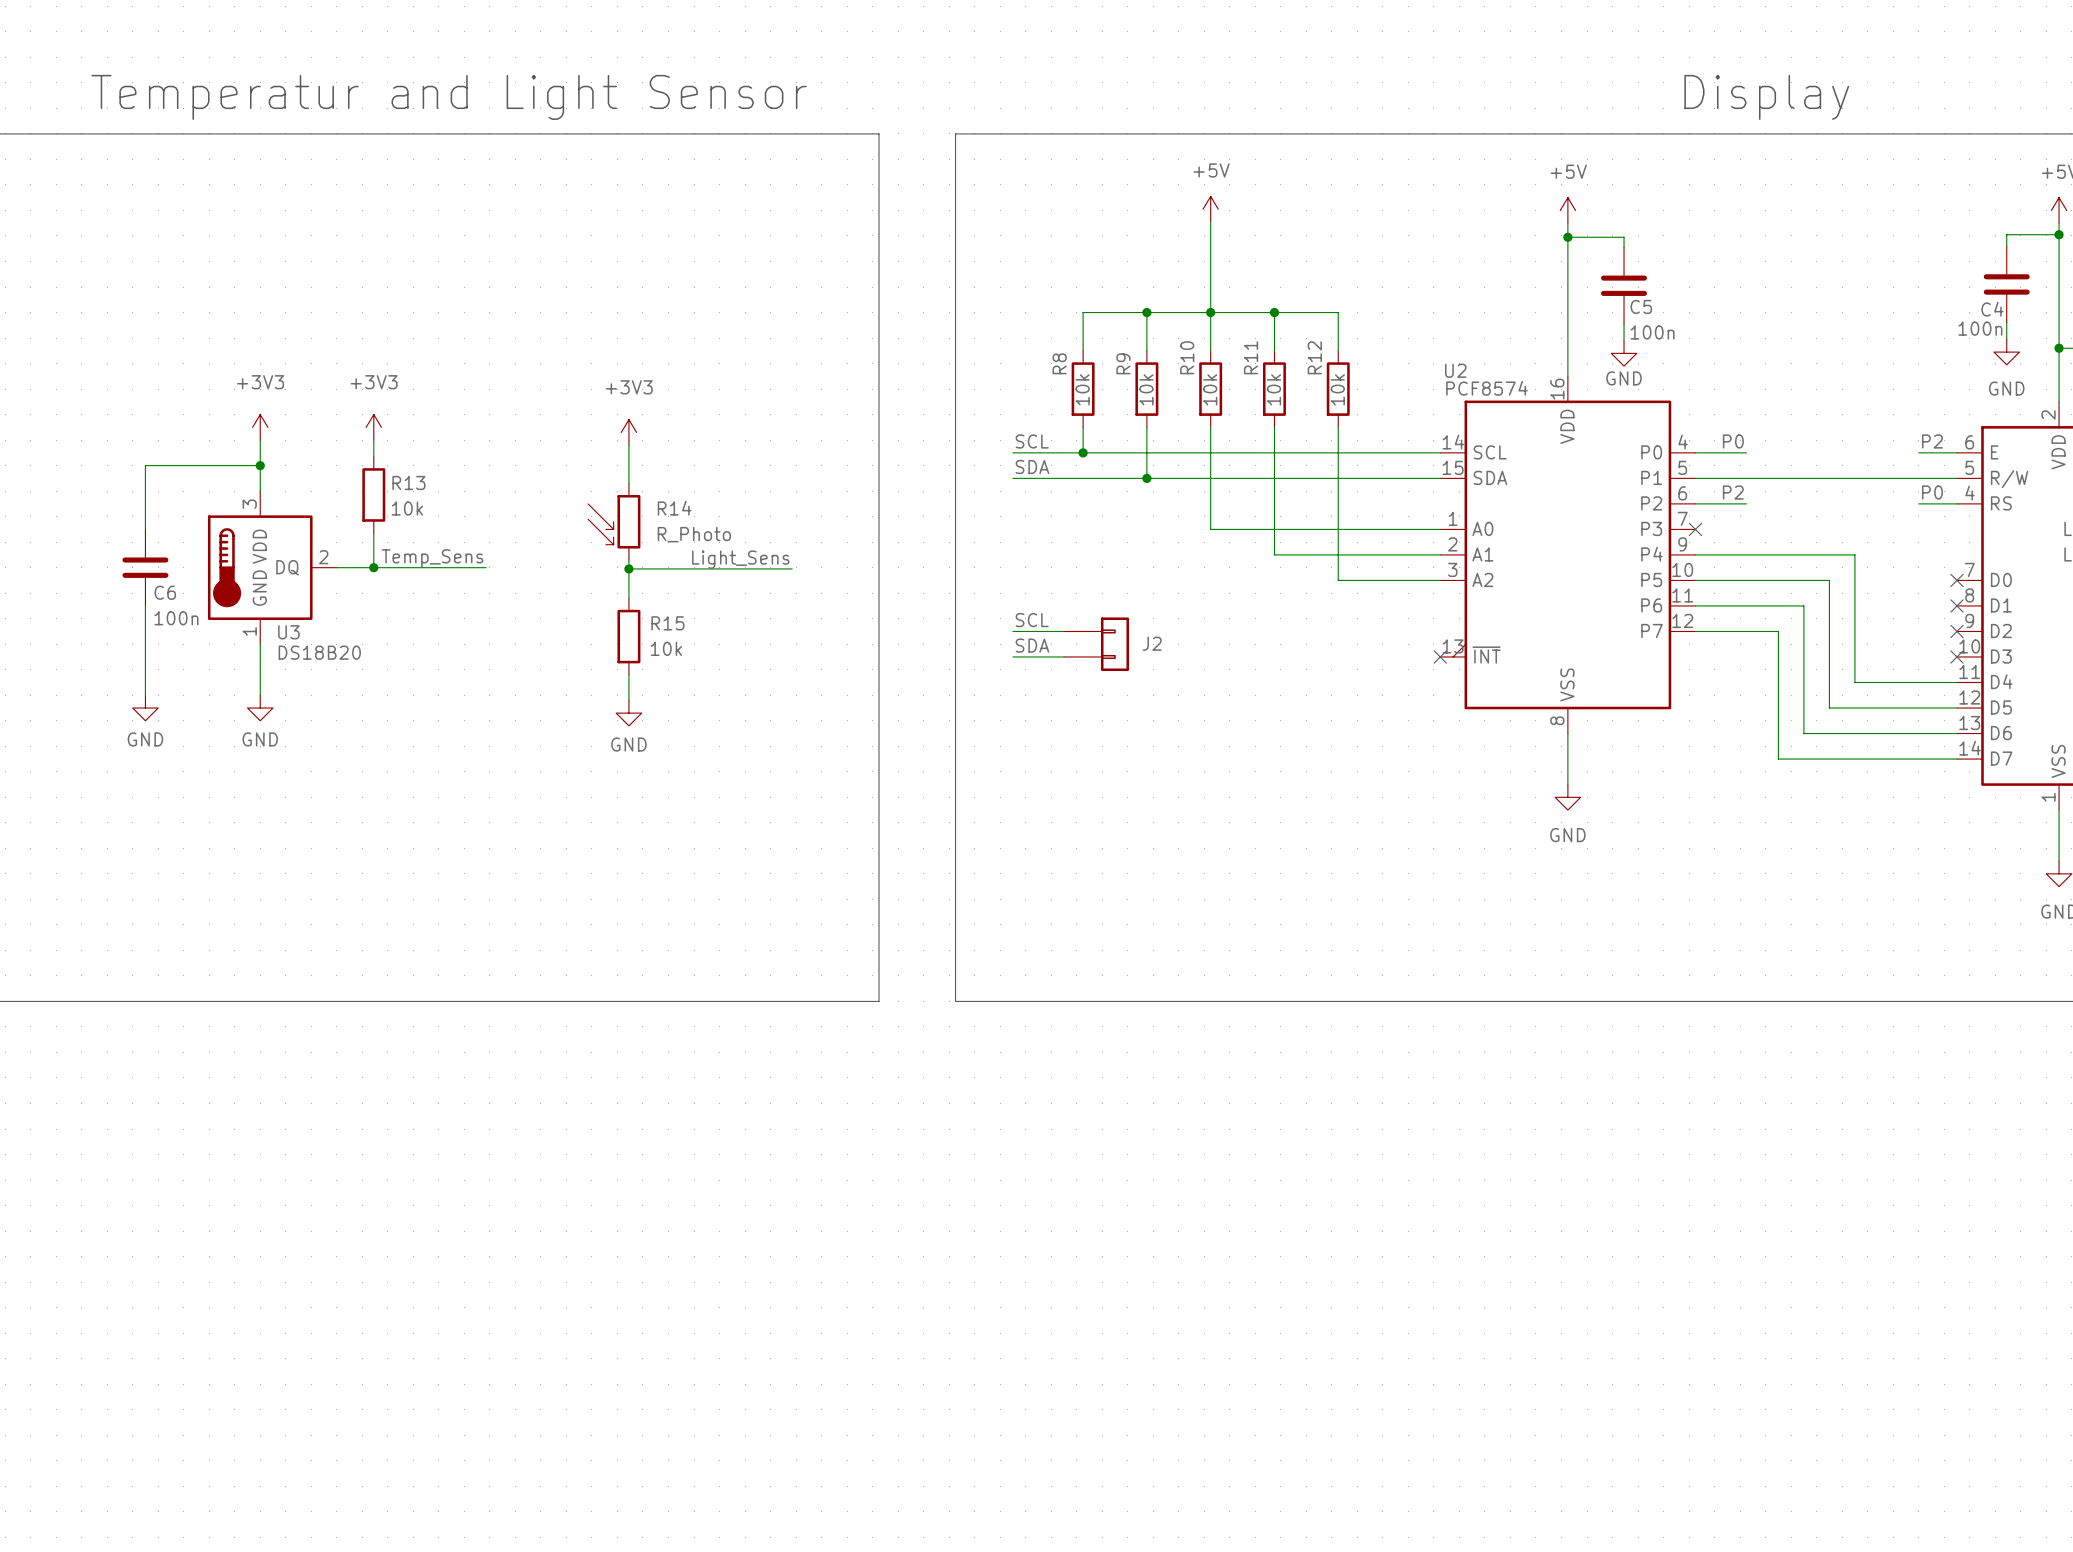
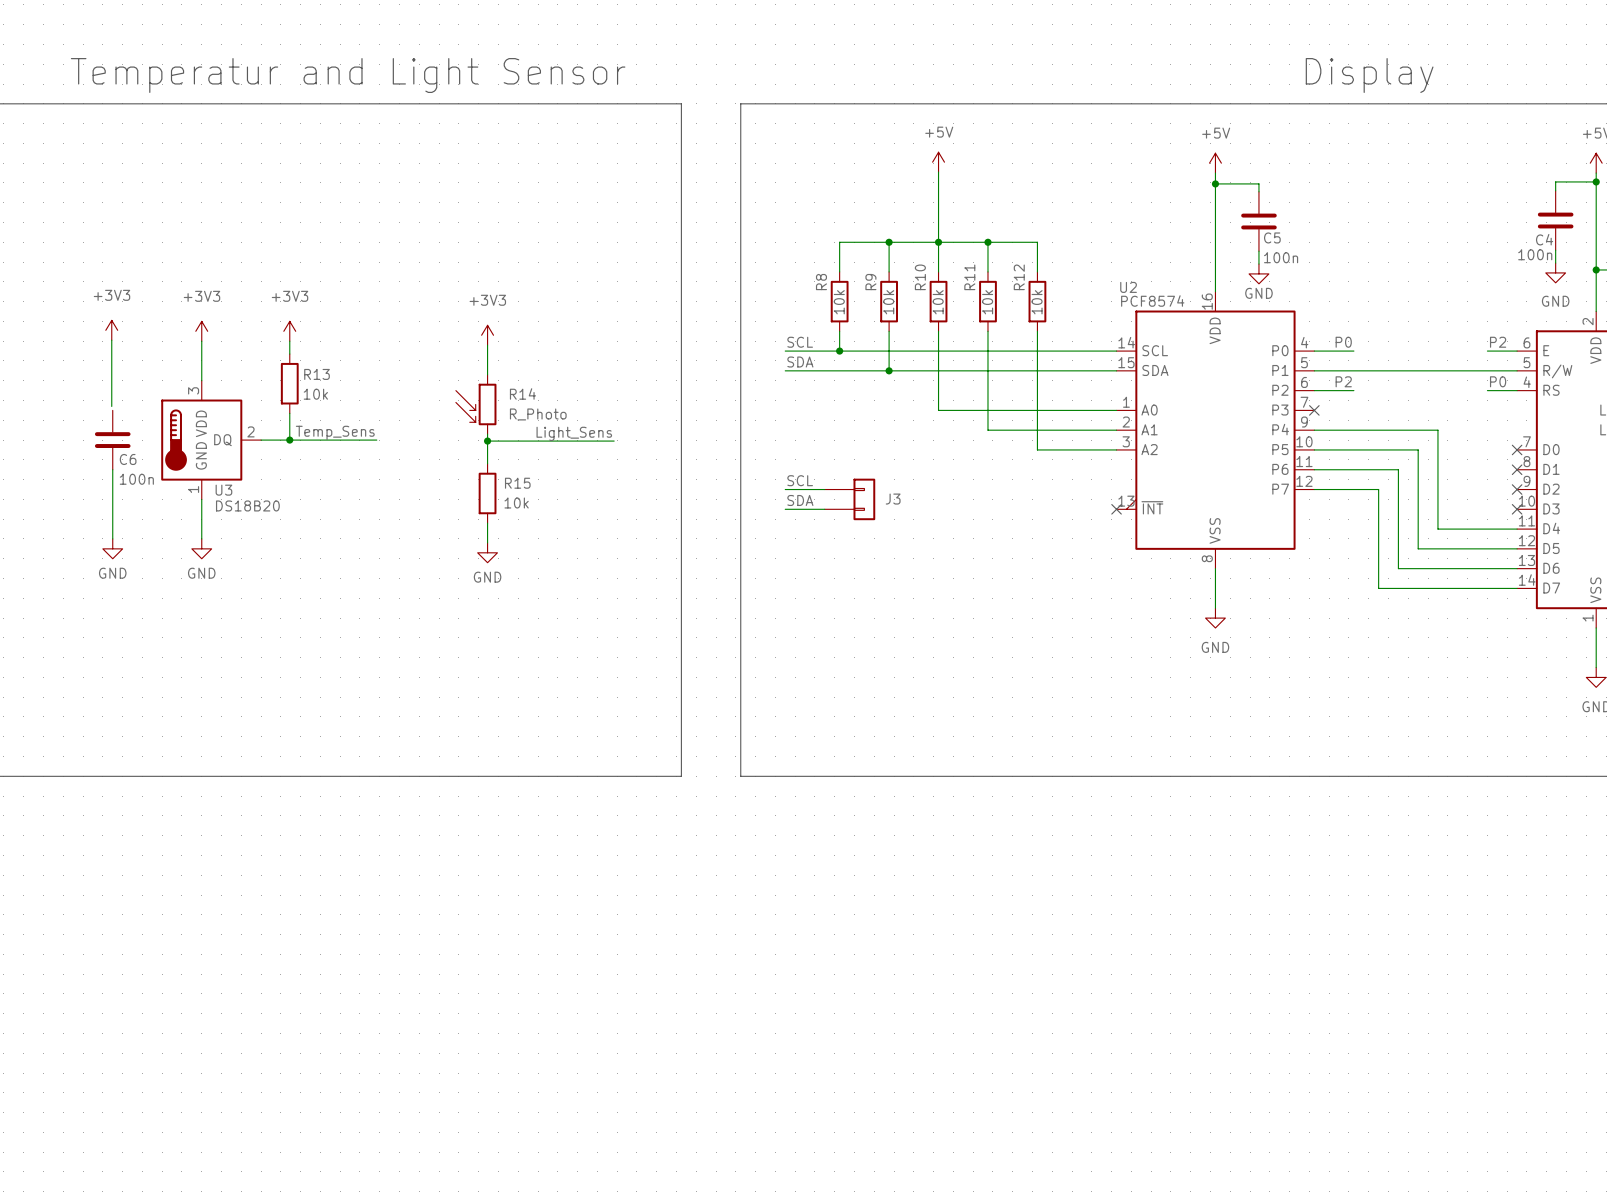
power symbol: none -> +3V3 (111, 330)
wire: none -> (111, 340) (111, 406)
wire: (260, 465) (145, 465) (145, 529) -> none
junction: (260, 465) -> none
J2 name: J2 (1152, 643) -> J3 (893, 499)

